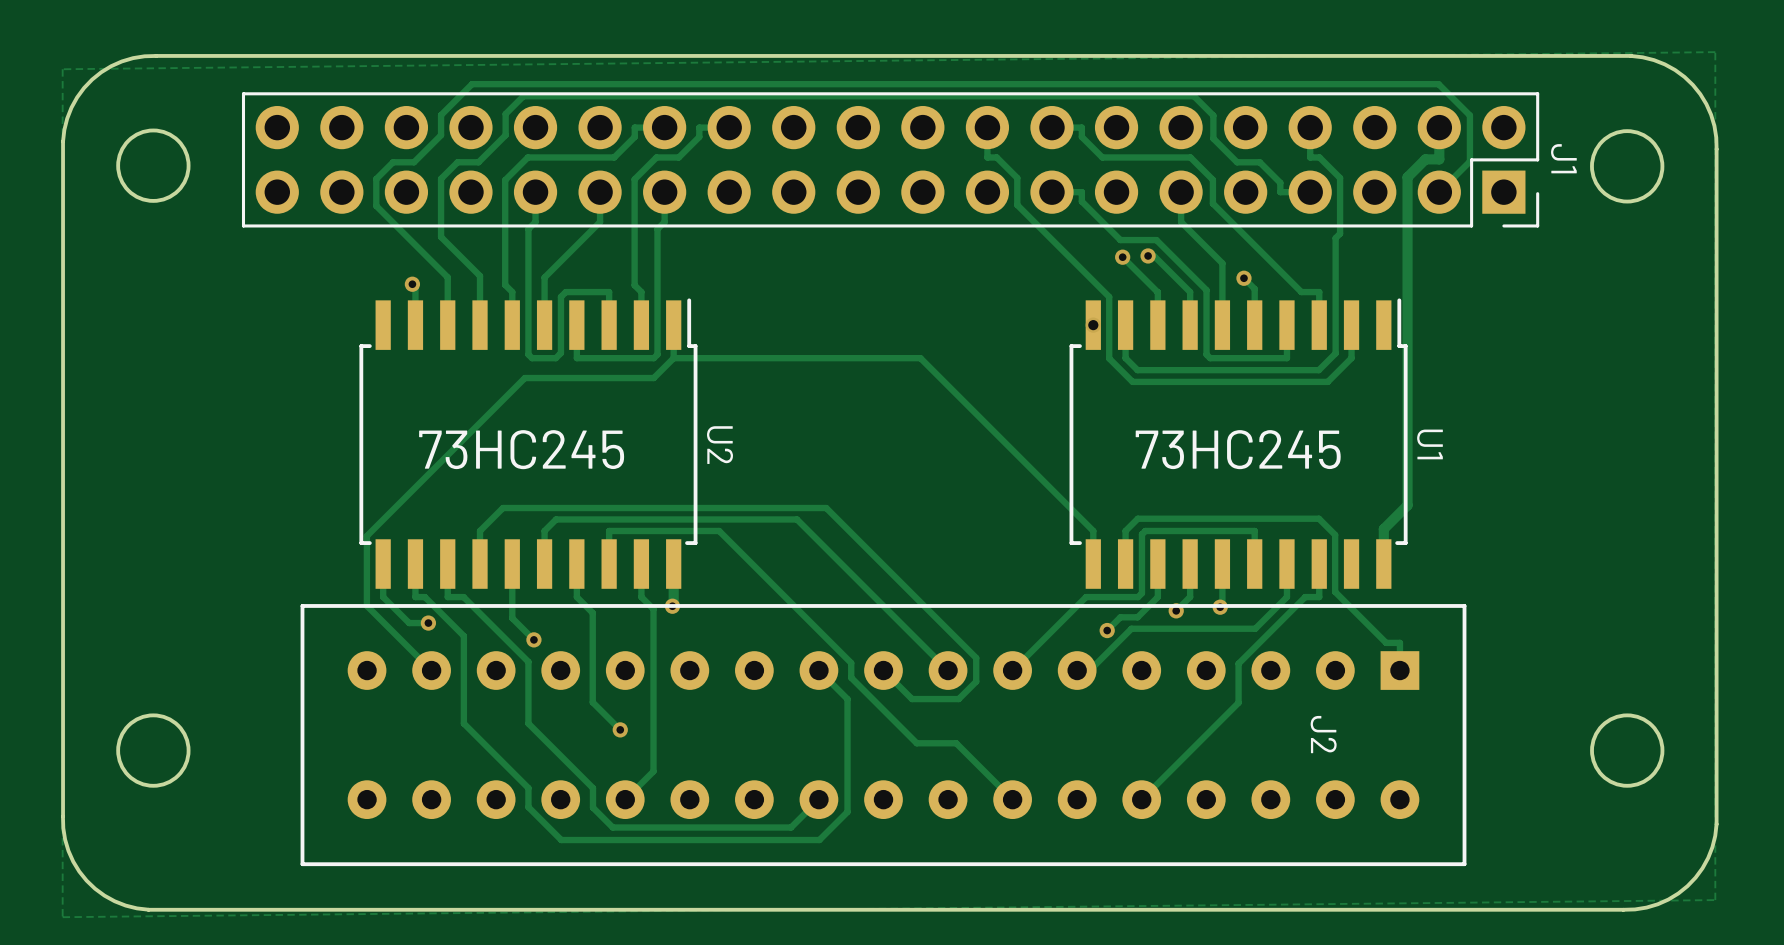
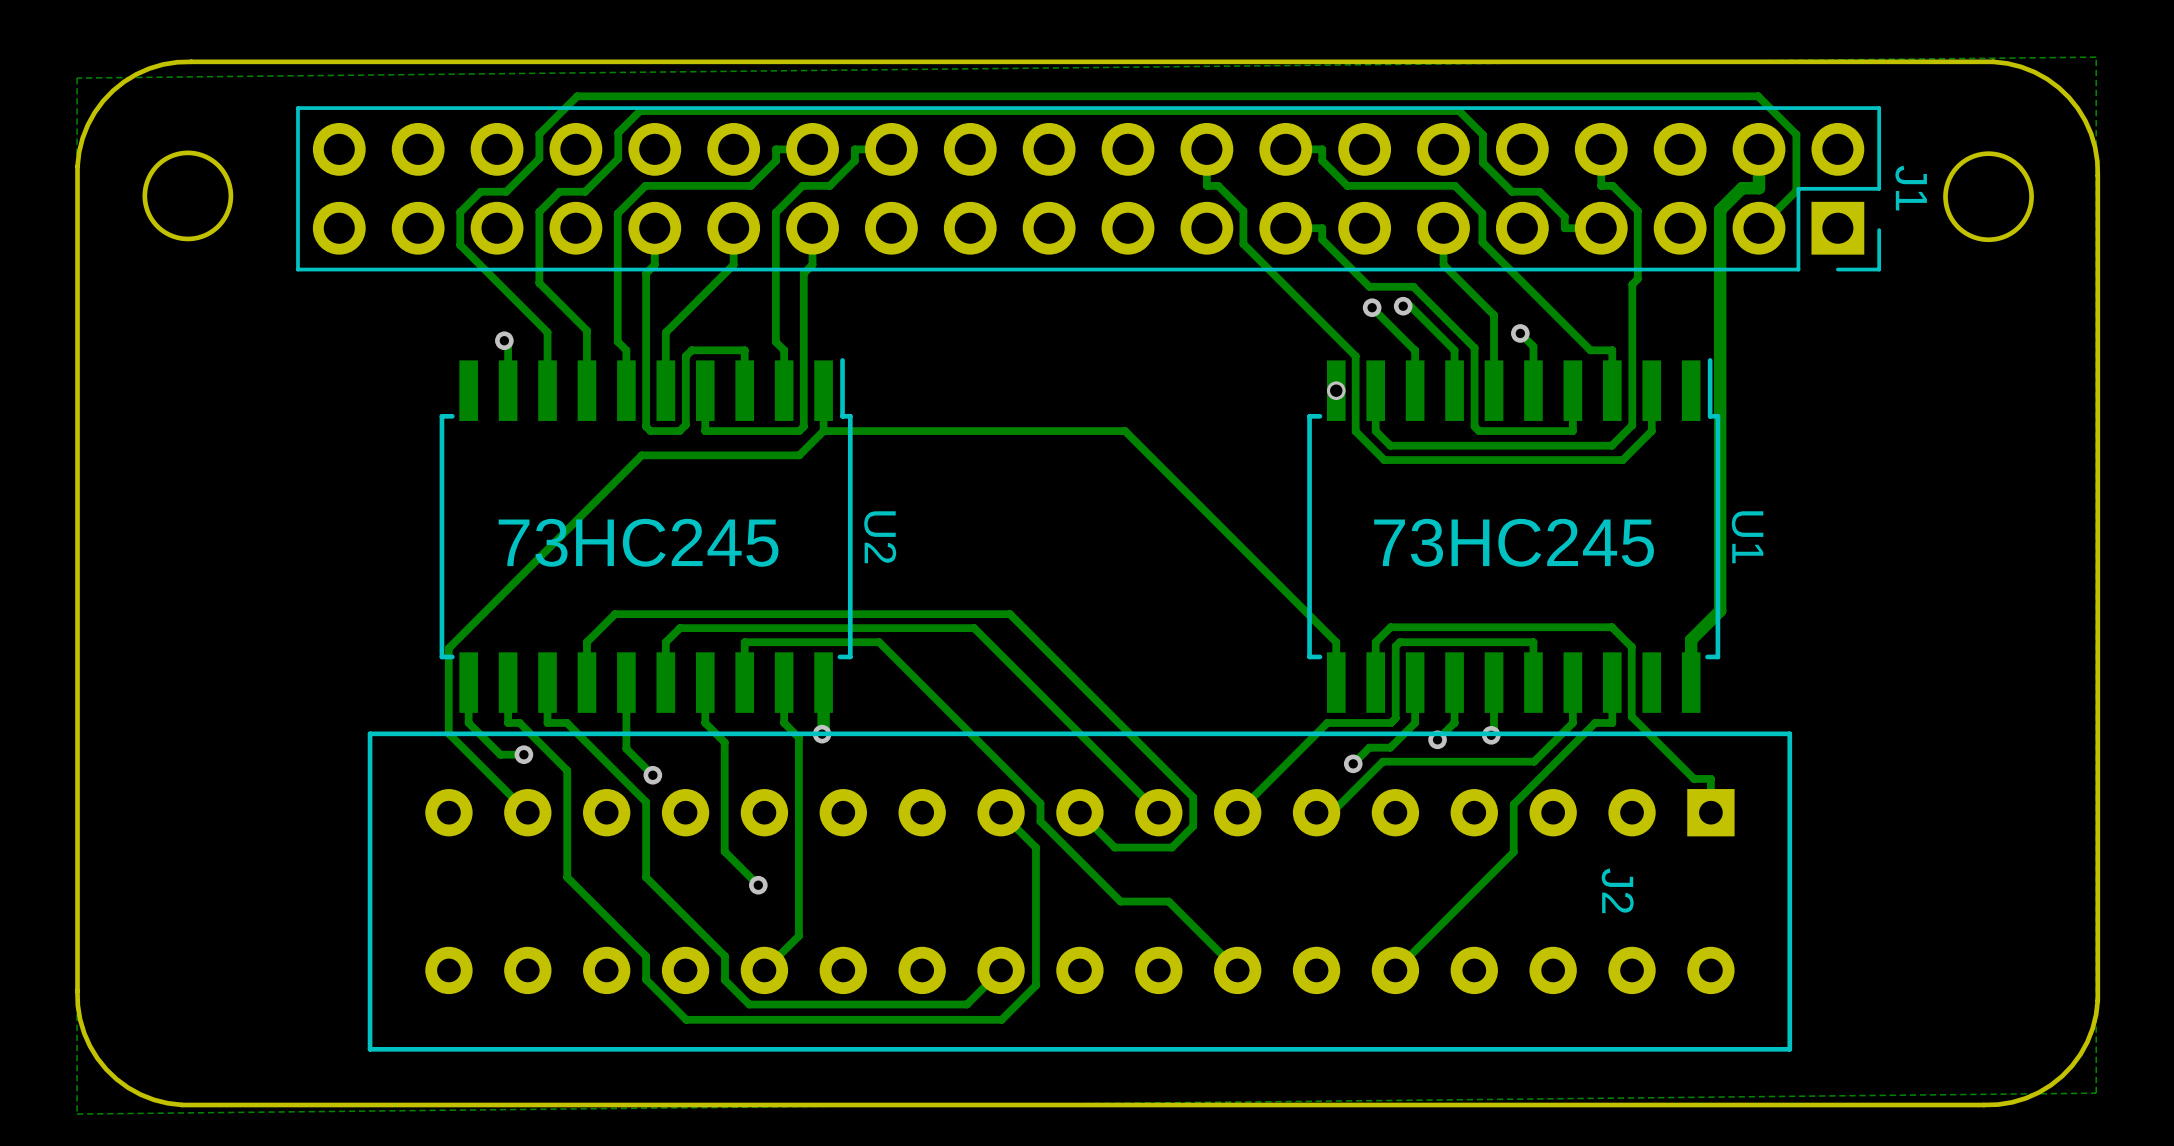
round board edge: [116, 713, 191, 788] -> none
round board edge: [1590, 713, 1665, 788] -> none

